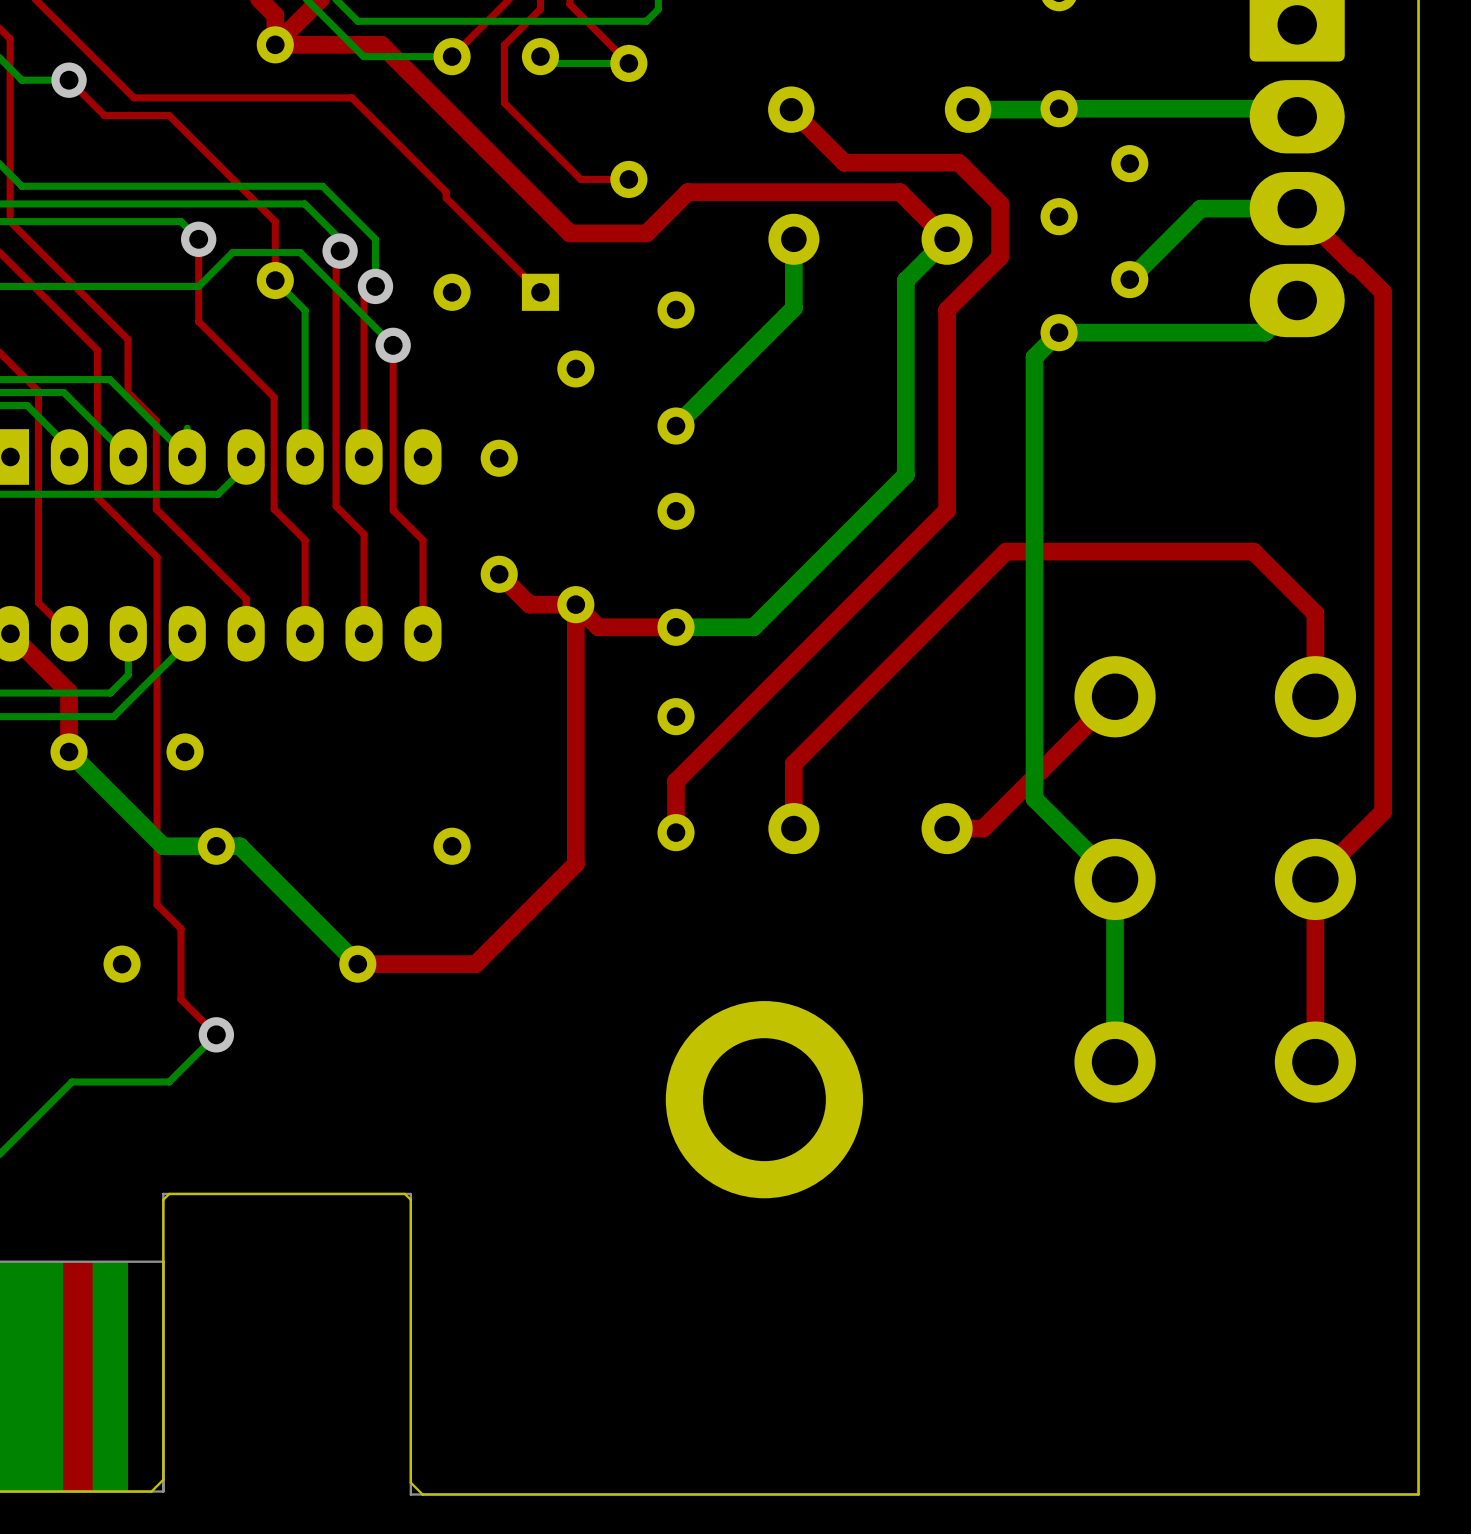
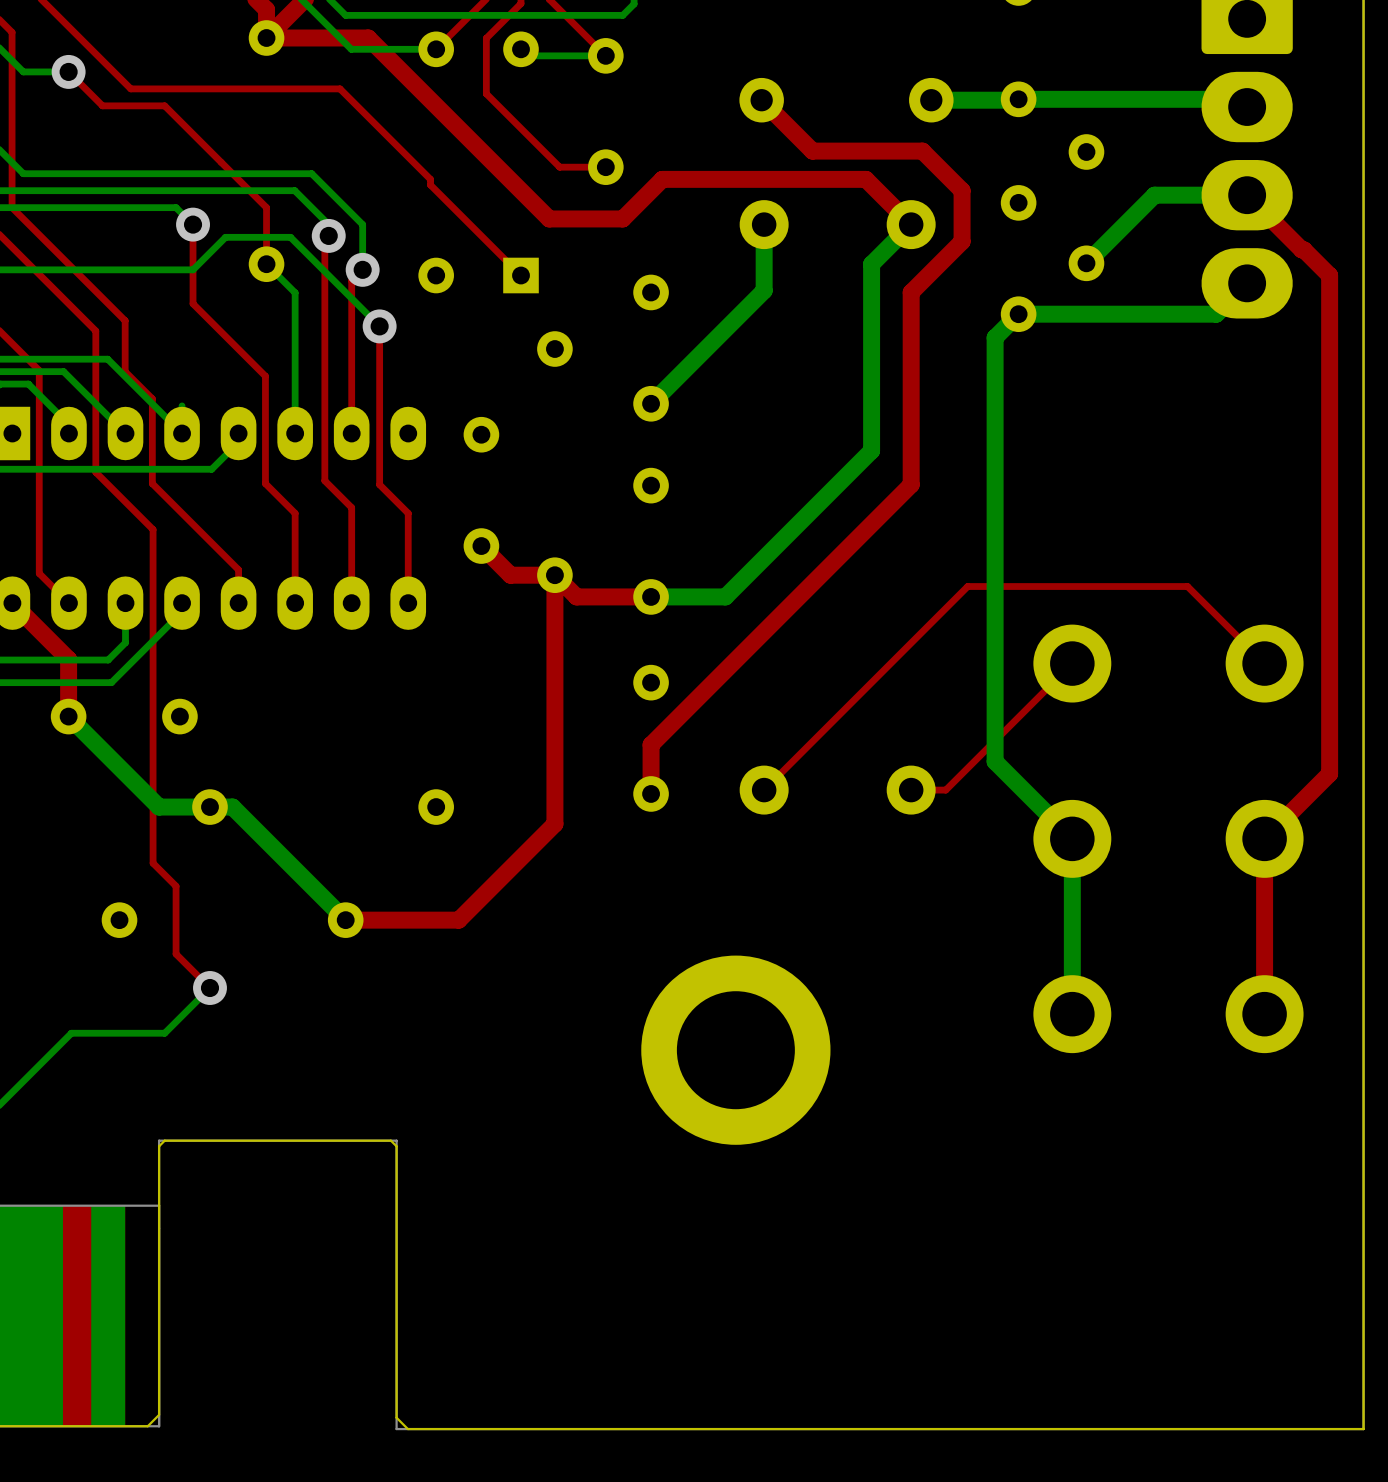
top track width: thick (1115, 696) (983, 828) (947, 828) -> thin (1072, 663) (945, 790) (911, 790)
top track: (1315, 696) (1315, 613) (1253, 551) (1006, 551) (793, 763) (793, 828) -> (1264, 663) (1187, 586) (967, 586) (764, 790)

